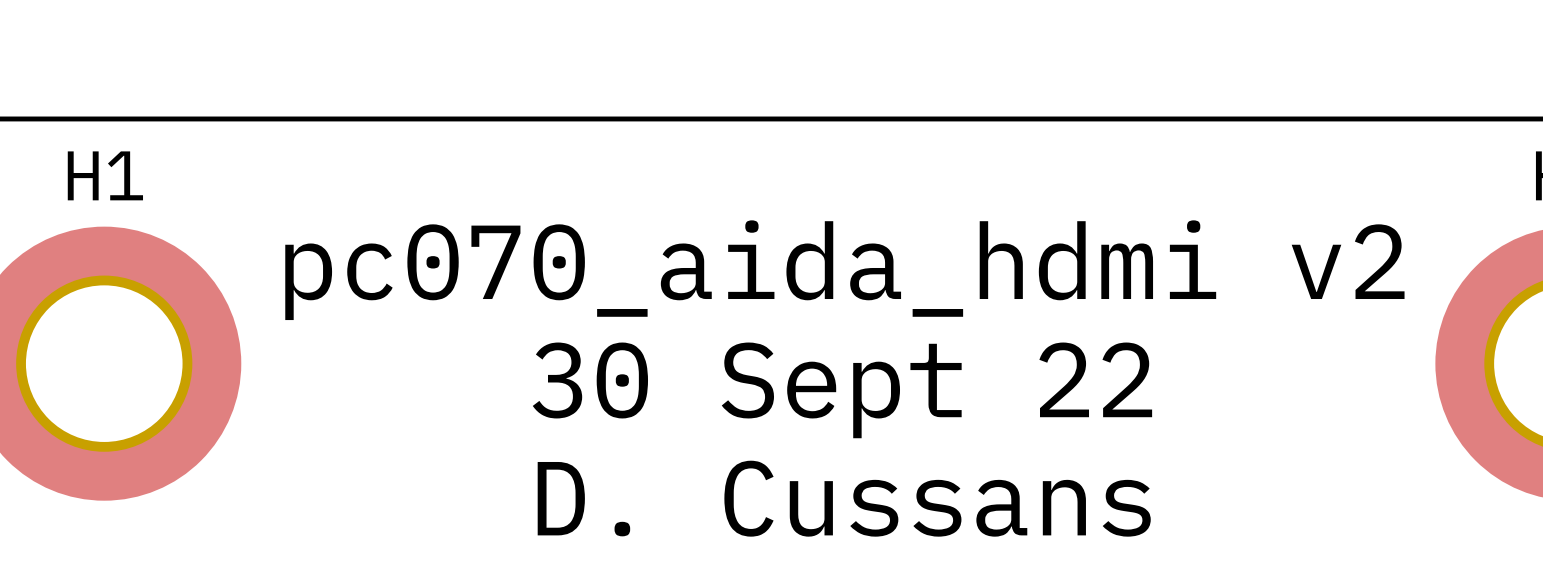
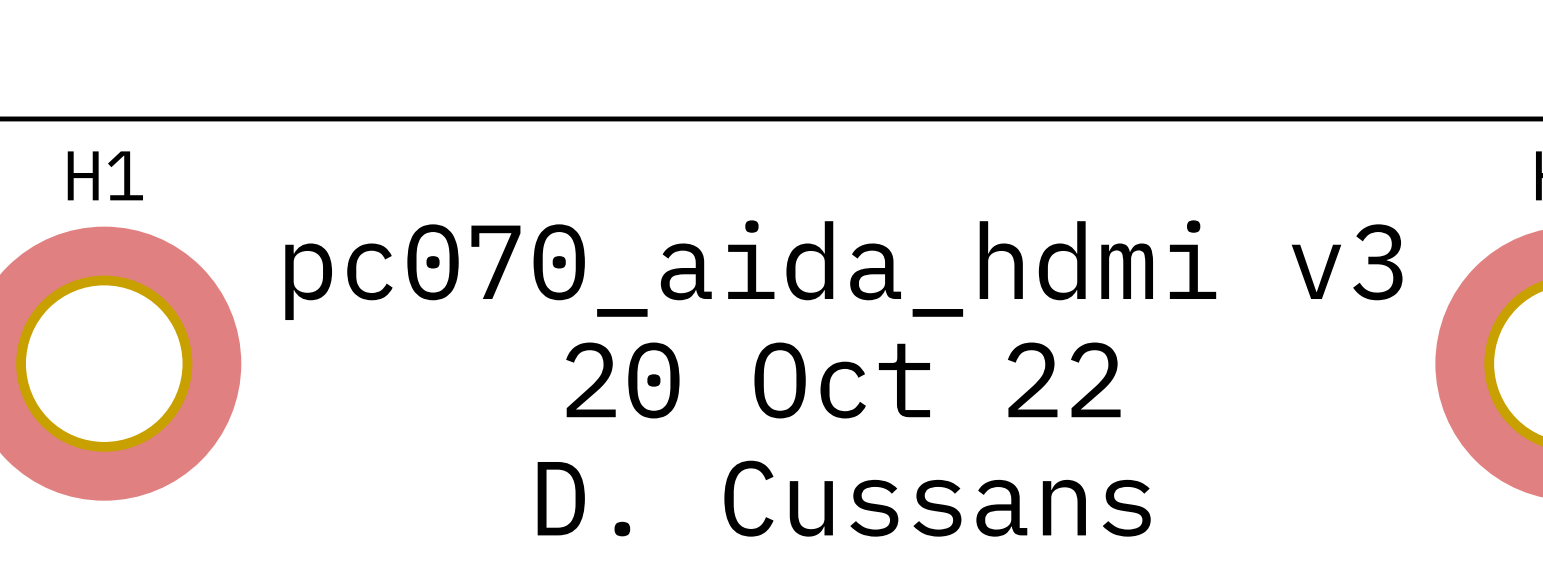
text: pc070_aida_hdmi v2 (844, 270) -> pc070_aida_hdmi v3 (843, 270)
text: 30 Sept 22 (842, 390) -> 20 Oct 22 (843, 380)

